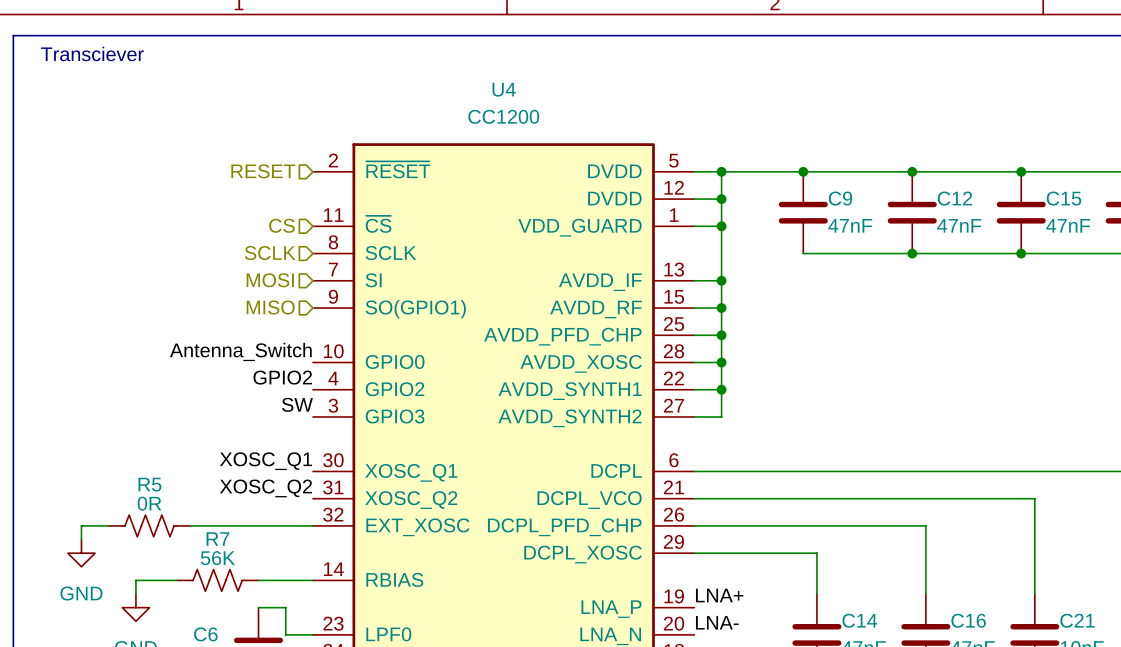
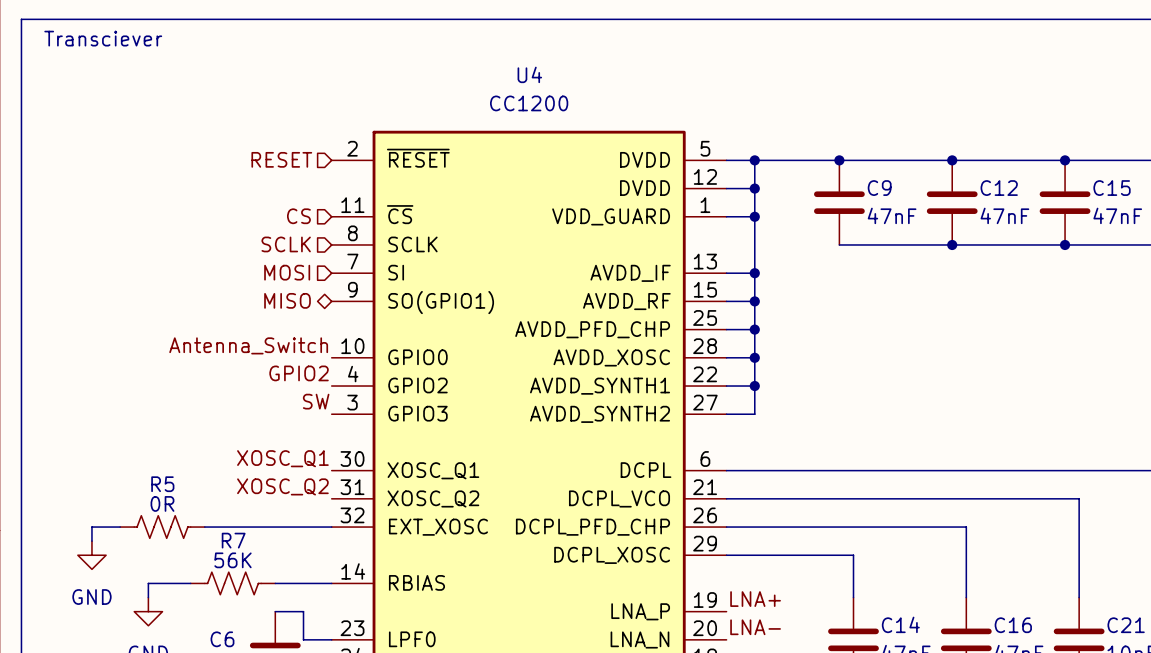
hierarchical label shape: input (270, 307) -> bidirectional (287, 300)

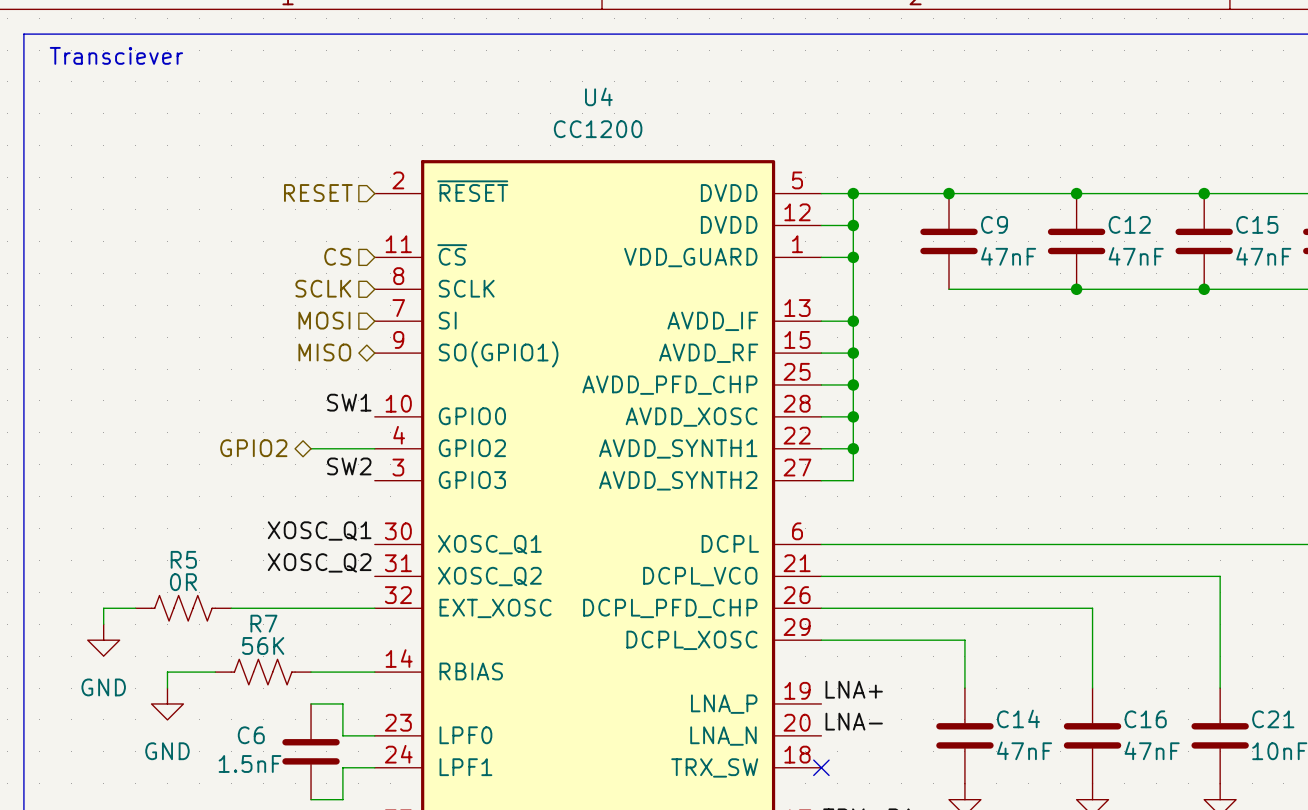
label: Antenna_Switch (248, 345) -> SW1 (349, 402)
label: GPIO2 (299, 373) -> none
hierarchical label: none -> GPIO2 (253, 448)
wire: none -> (311, 448) (374, 448)
label: SW (316, 401) -> SW2 (349, 466)

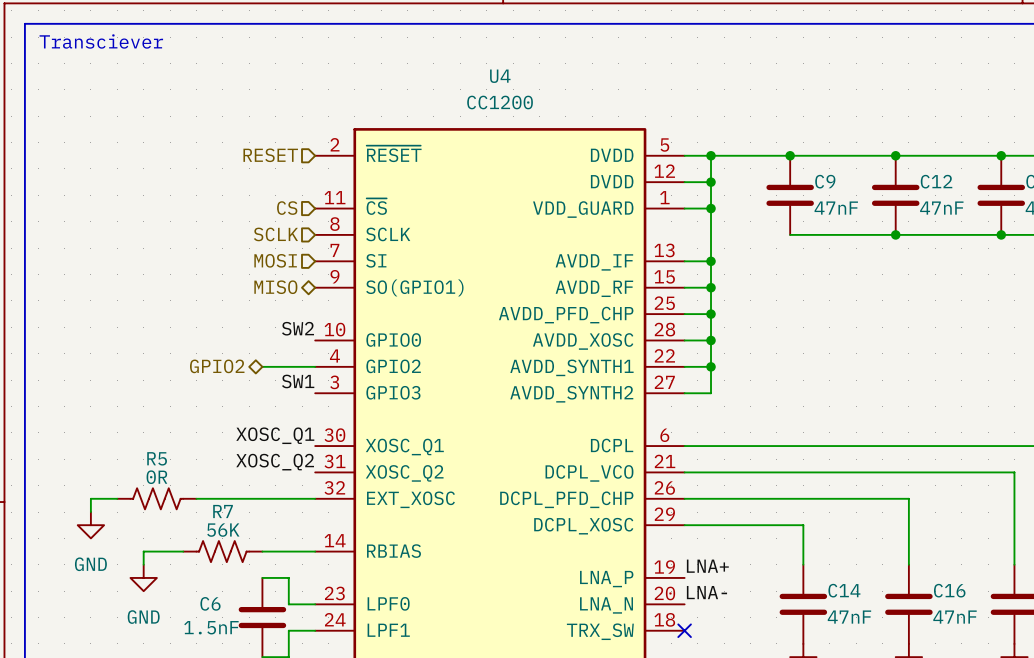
label: SW1 (349, 402) -> SW2 (298, 328)
label: SW2 (349, 466) -> SW1 (298, 381)

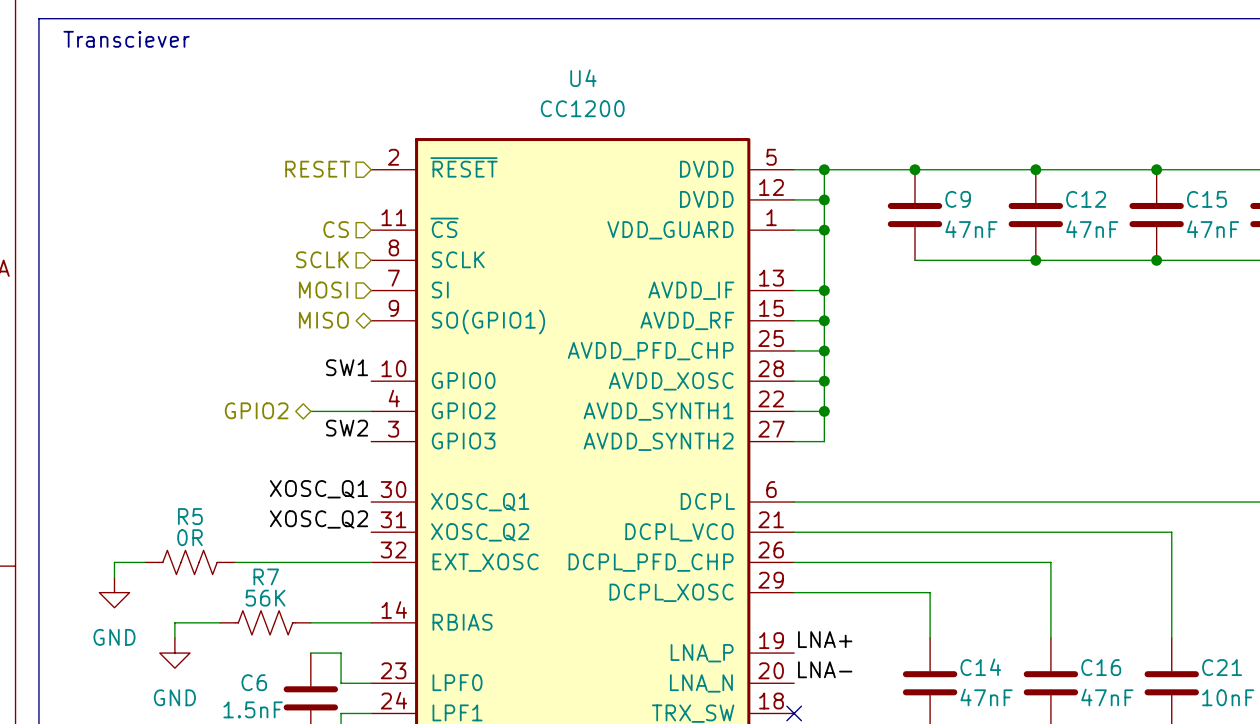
label: SW2 (298, 328) -> SW1 (347, 367)
label: SW1 (298, 381) -> SW2 (347, 428)

